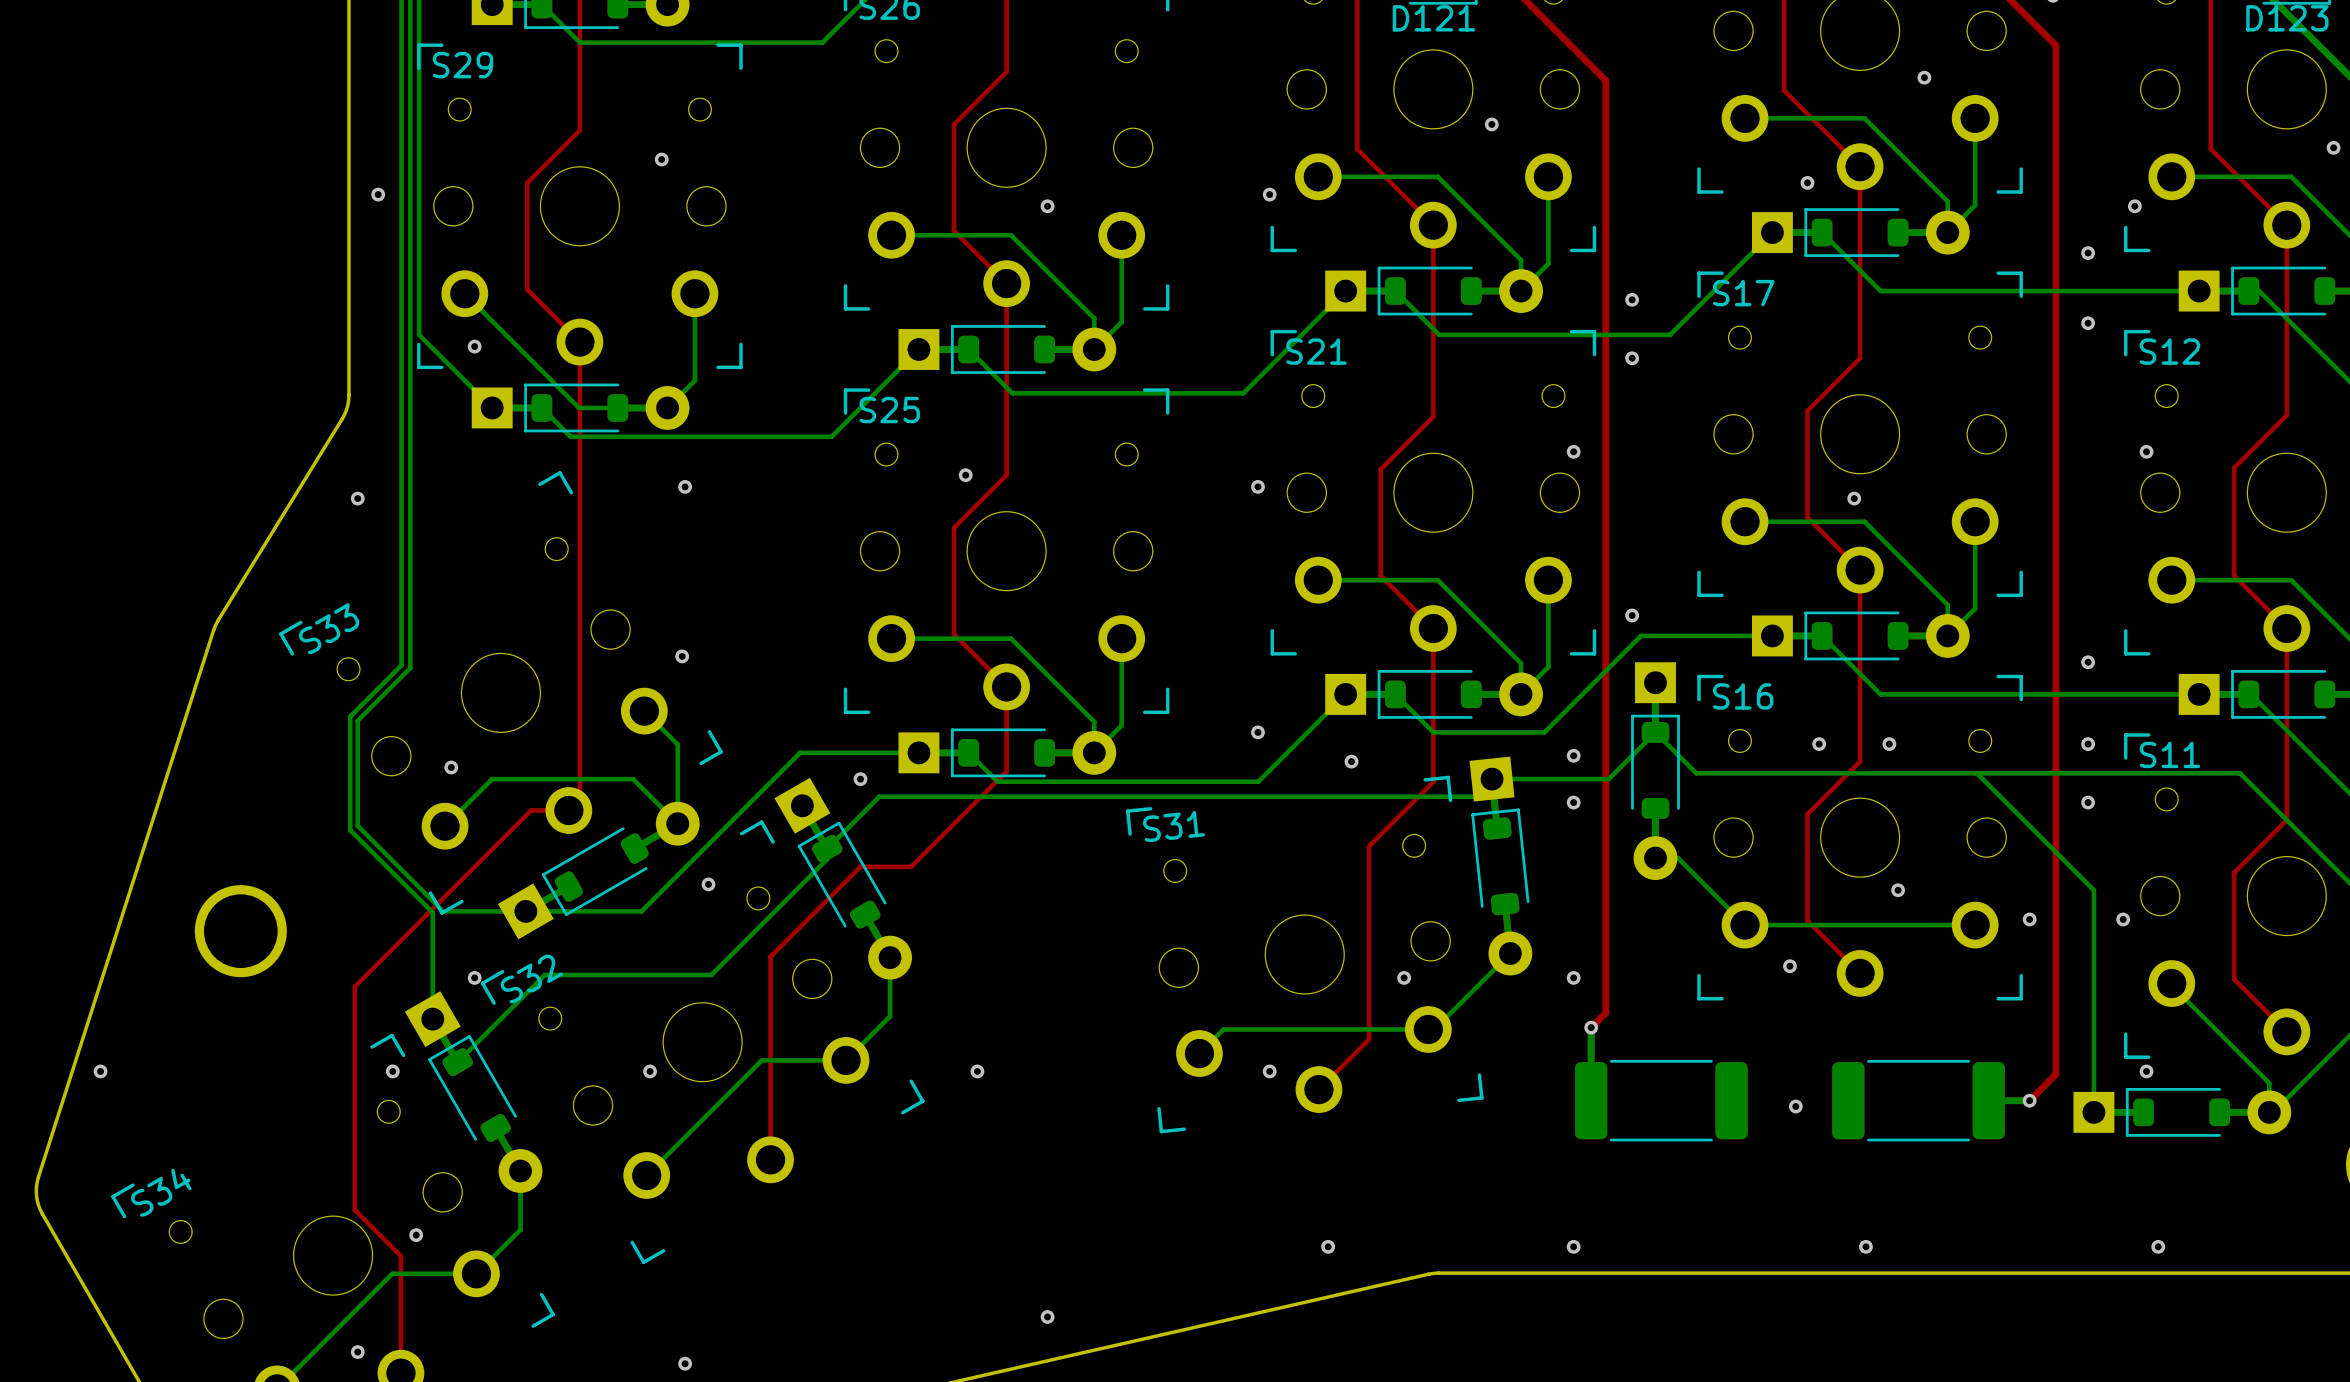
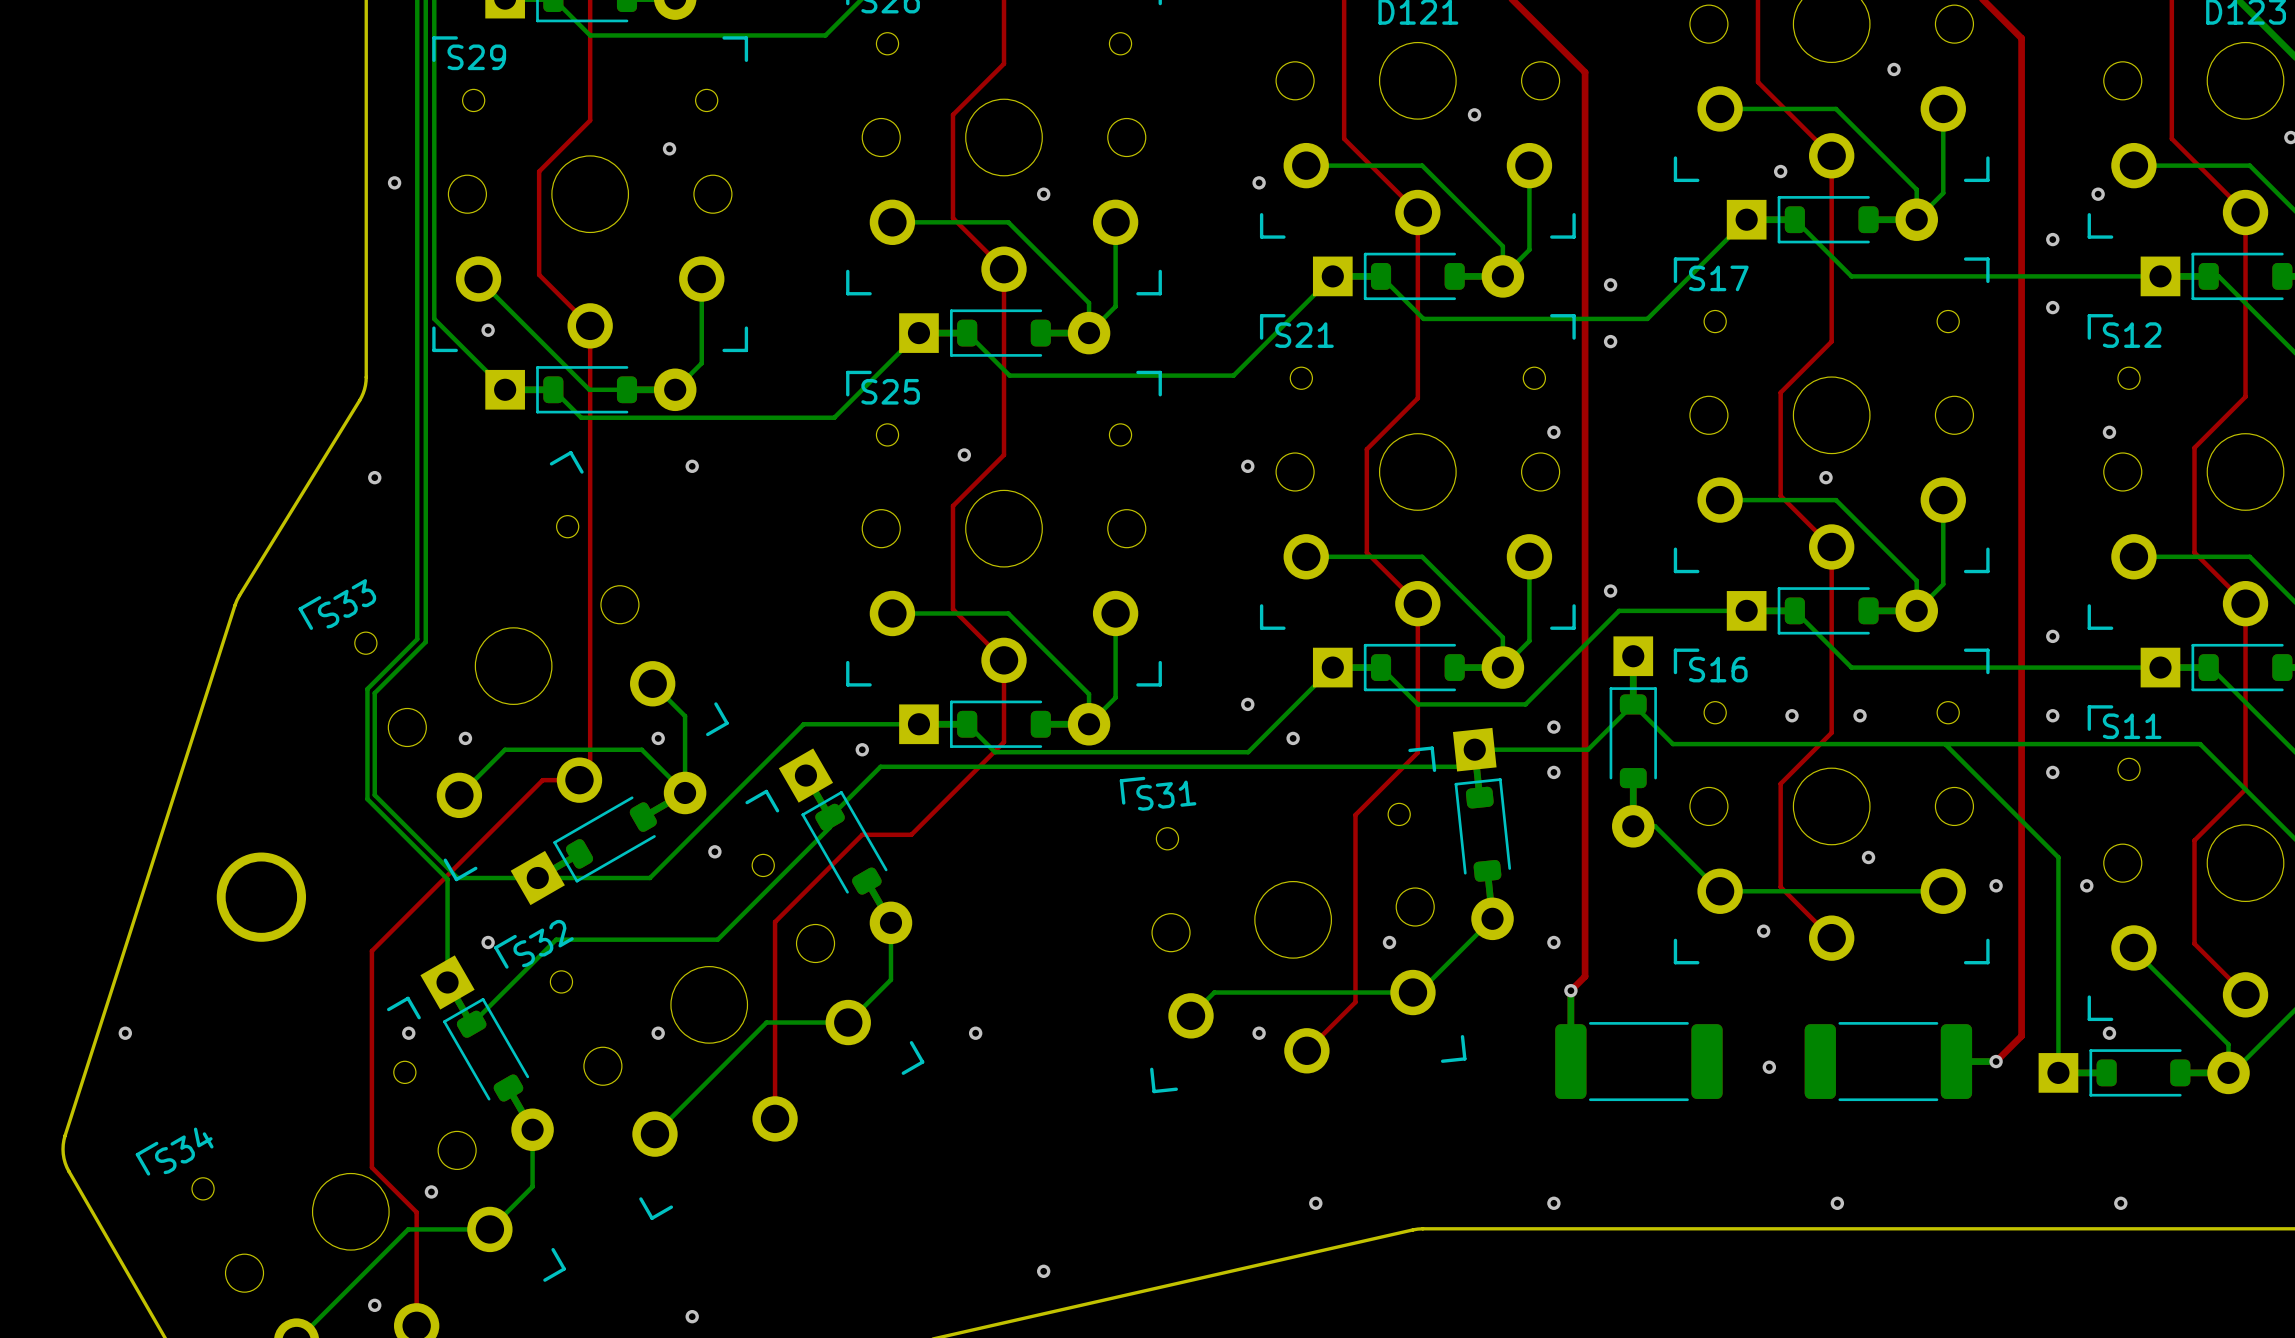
via position: (682, 656) -> (658, 738)
via position: (1351, 761) -> (1293, 738)

